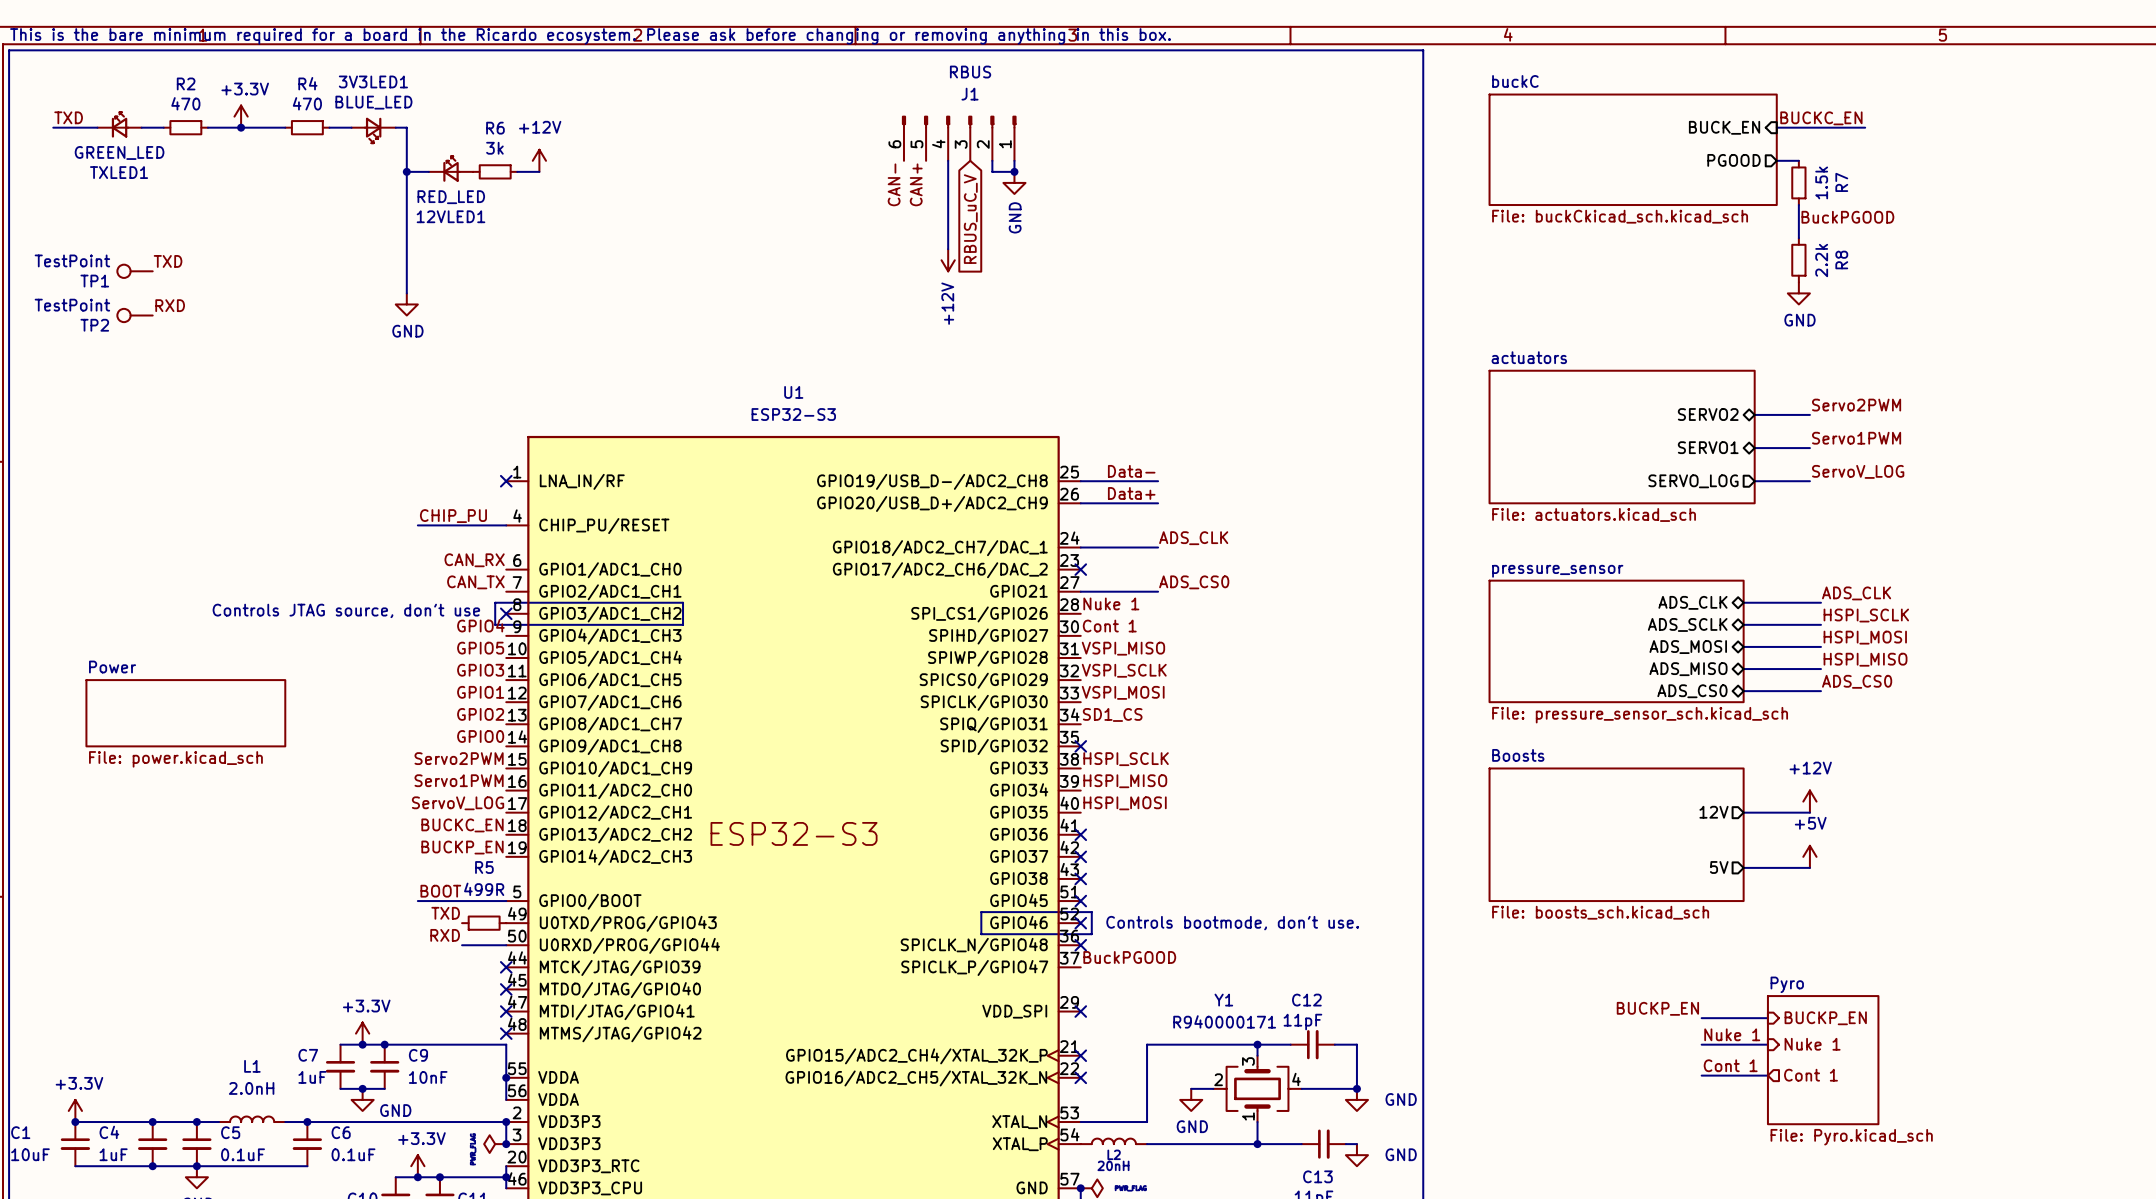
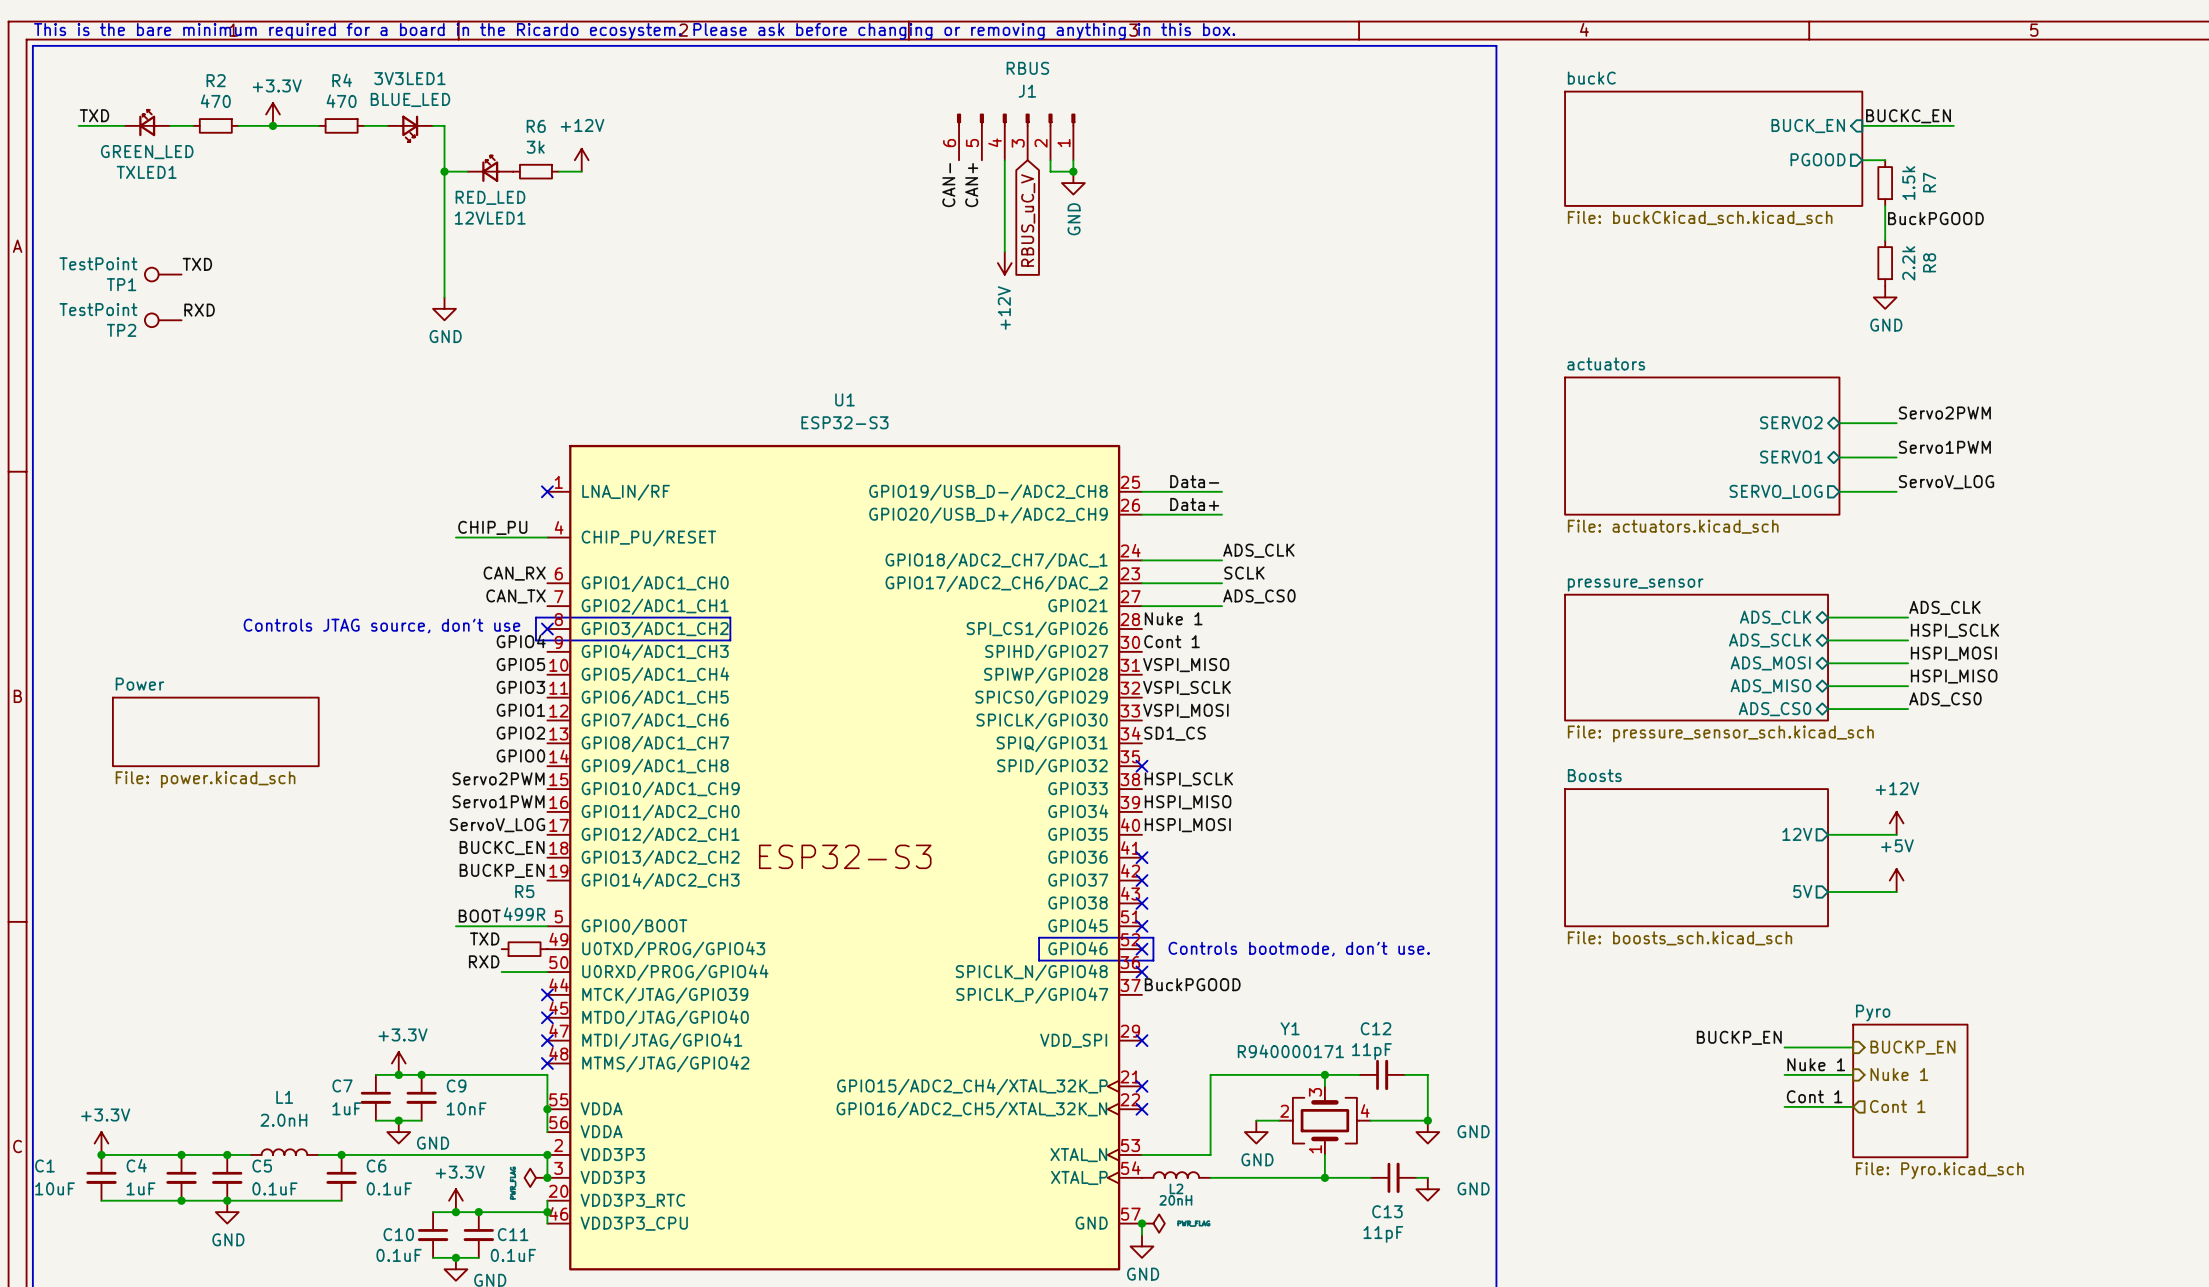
label: none -> SCLK (1244, 573)
wire: none -> (1141, 583) (1222, 583)
no-connect mark: (1080, 569) -> none

